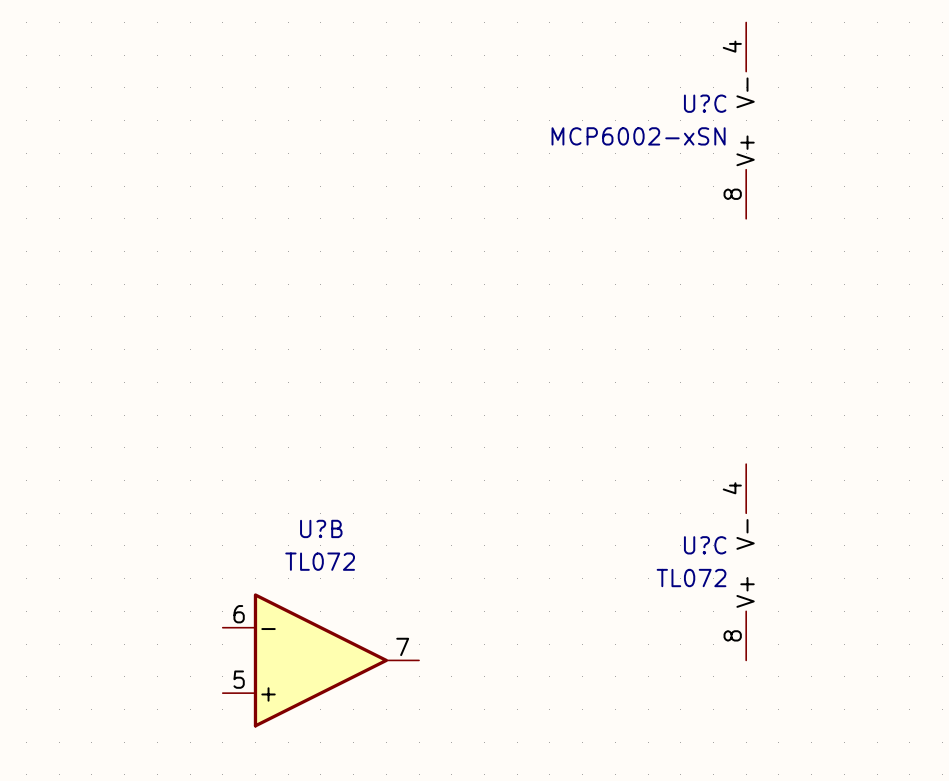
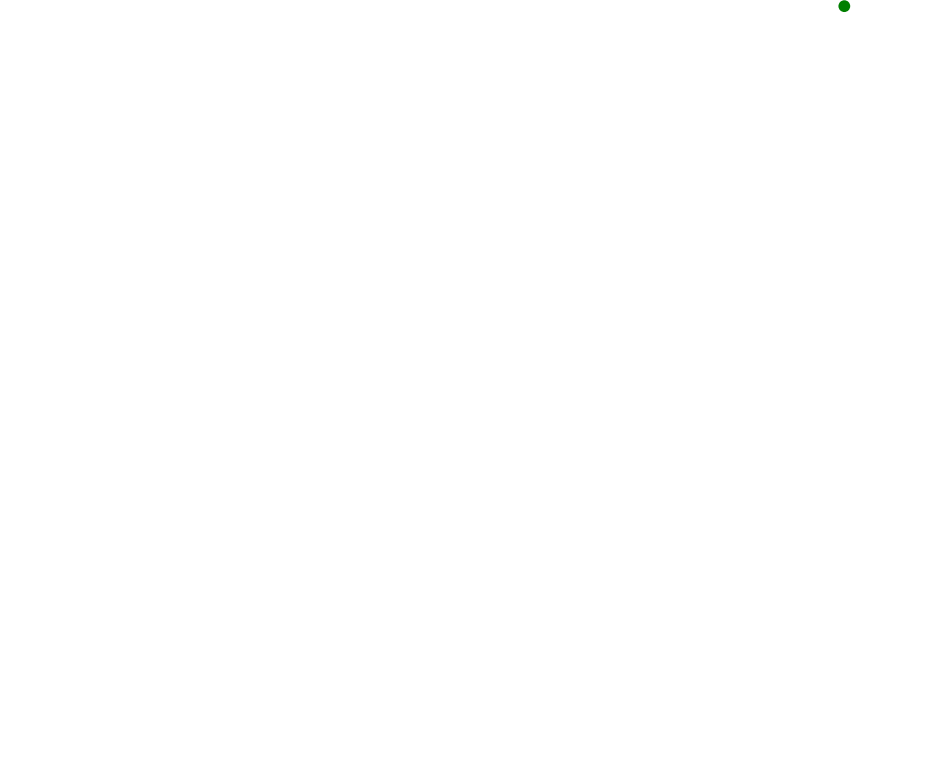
junction: none -> (844, 6)
U?C: MCP6002-xSN (746, 120) -> none
U?C: TL072 (746, 562) -> none
U?B: TL072 (320, 660) -> none

